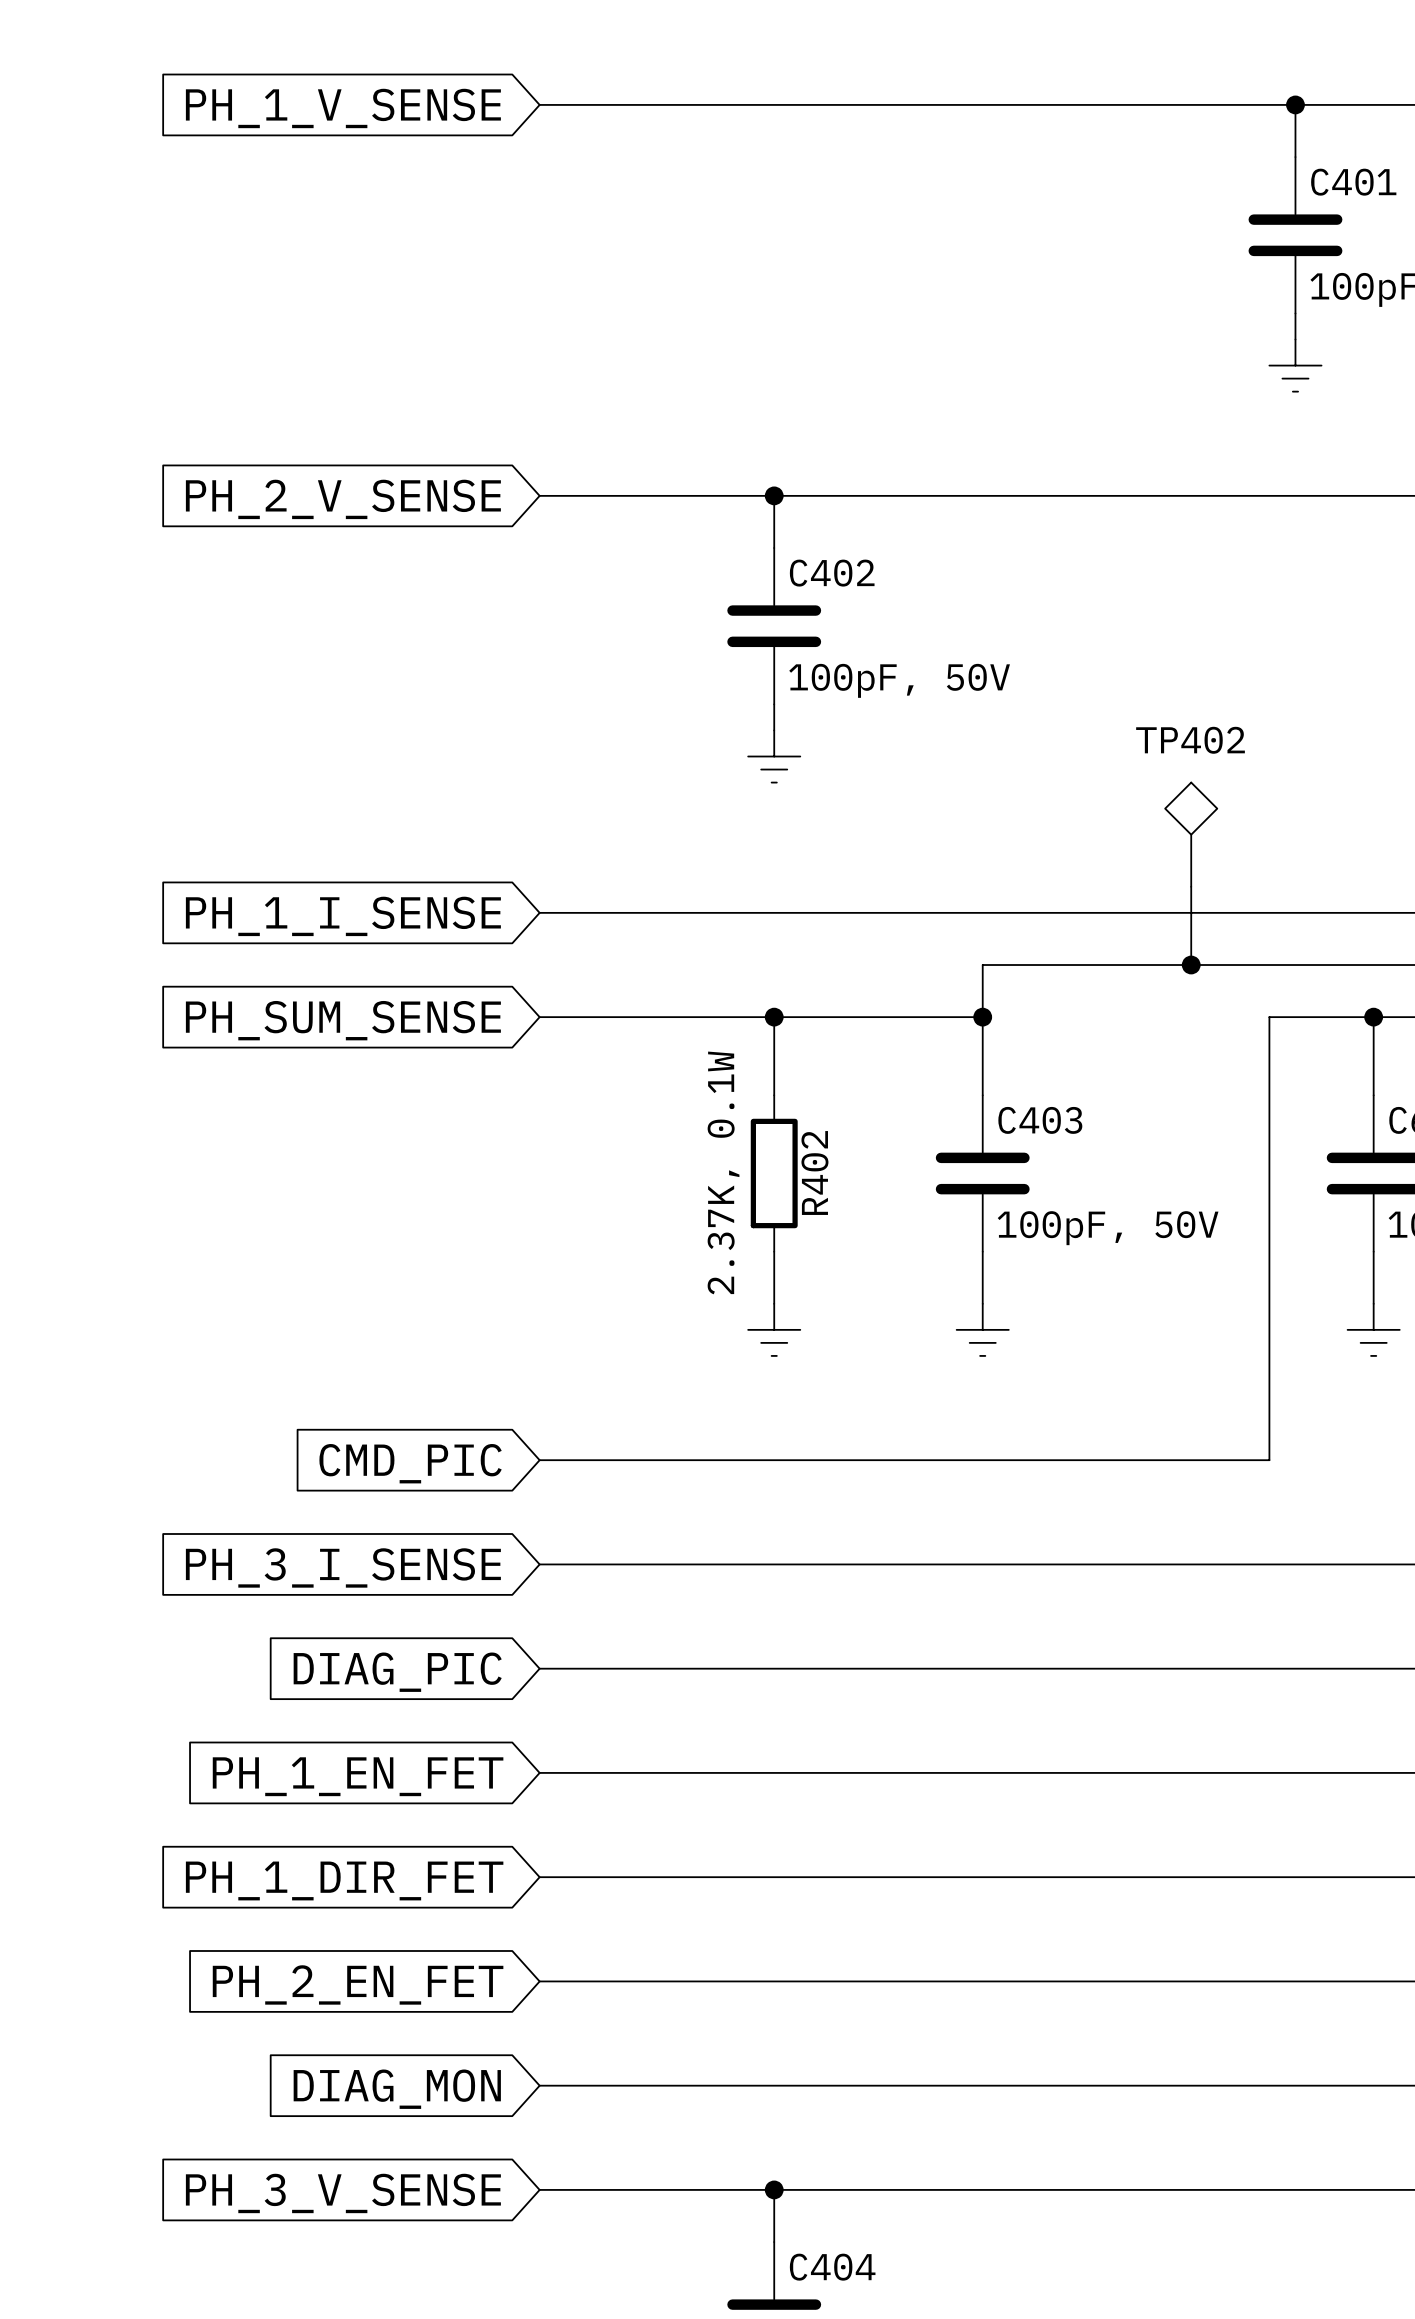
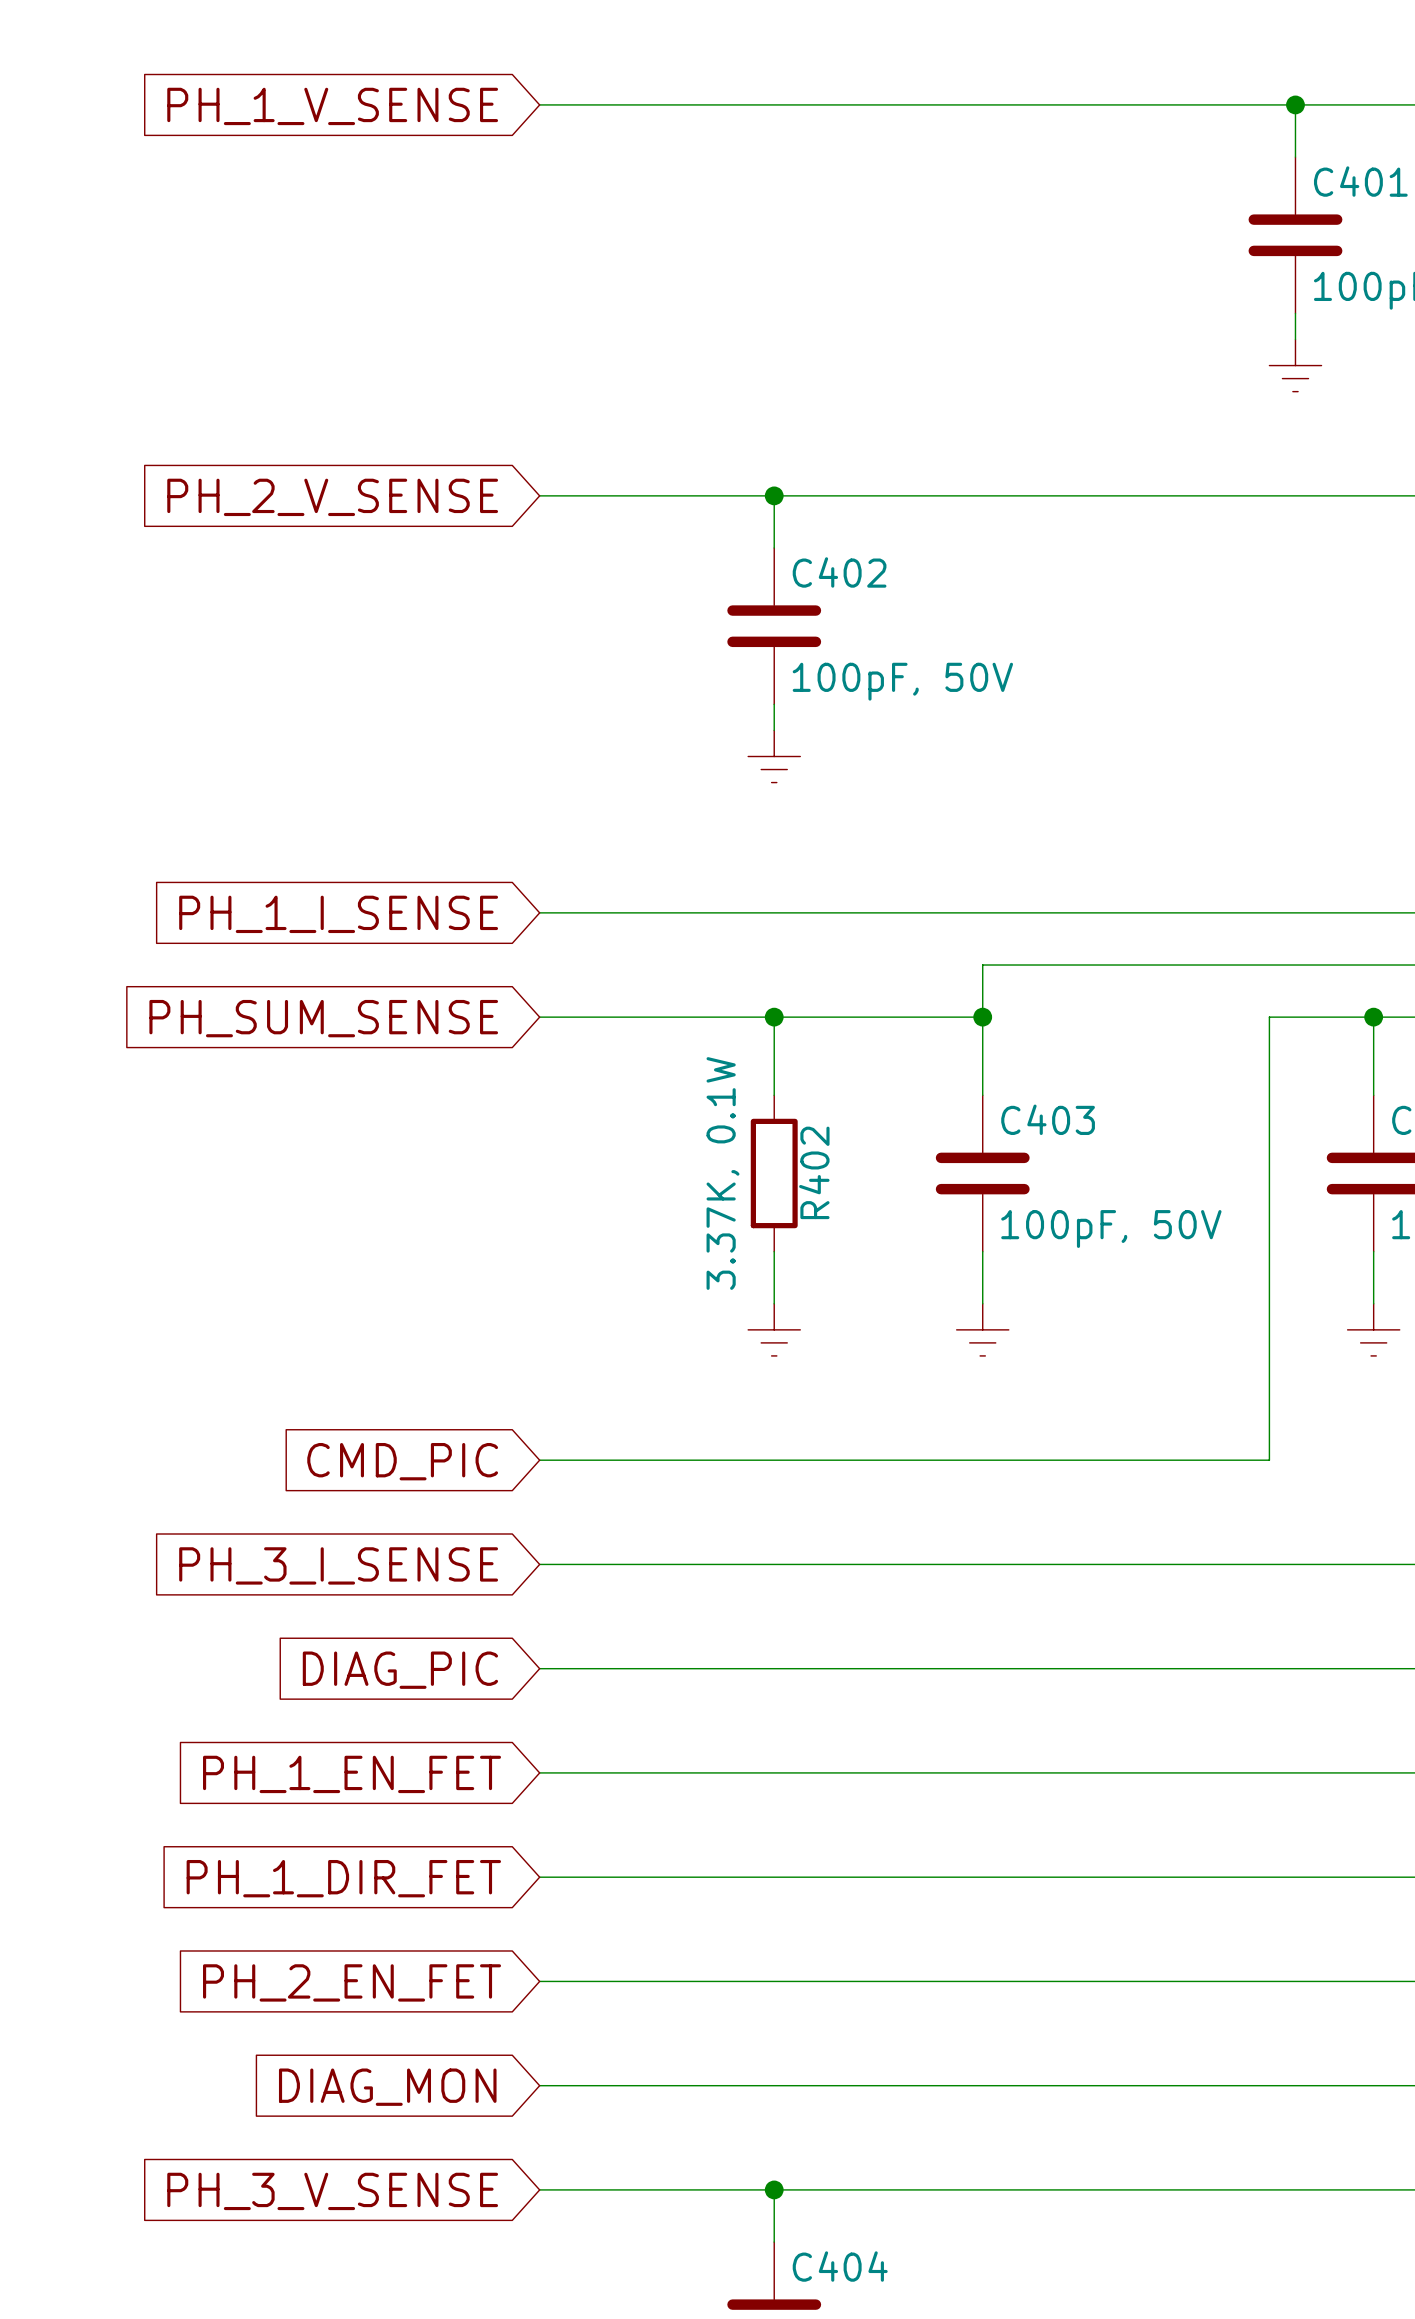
TP402: (1191, 834) -> none
wire: (1191, 886) (1191, 965) -> none
junction: (1191, 965) -> none
R402 value: 2.37K, 0.1W (723, 1172) -> 3.37K, 0.1W (722, 1173)

